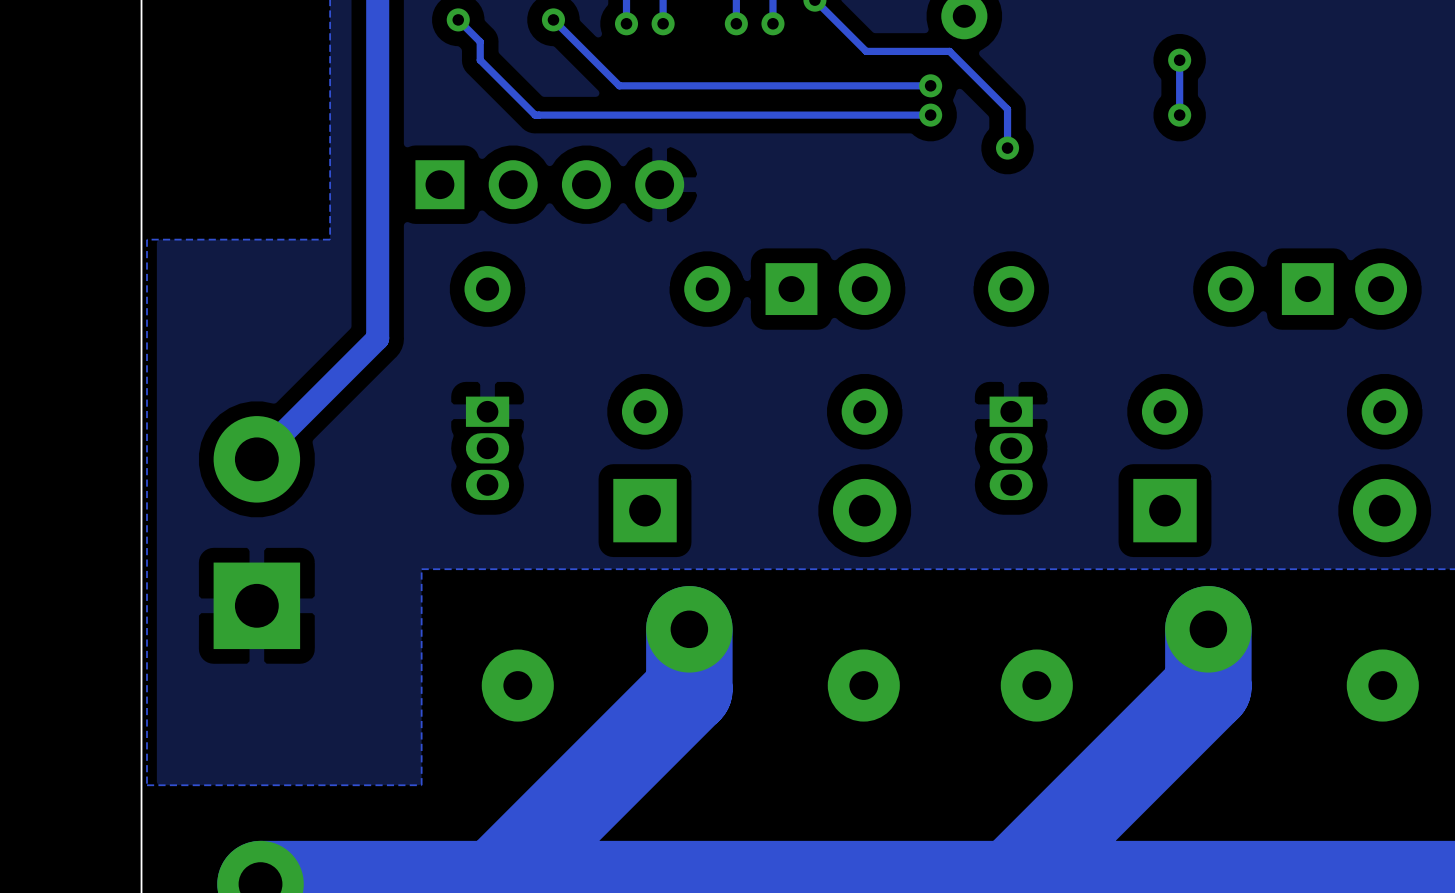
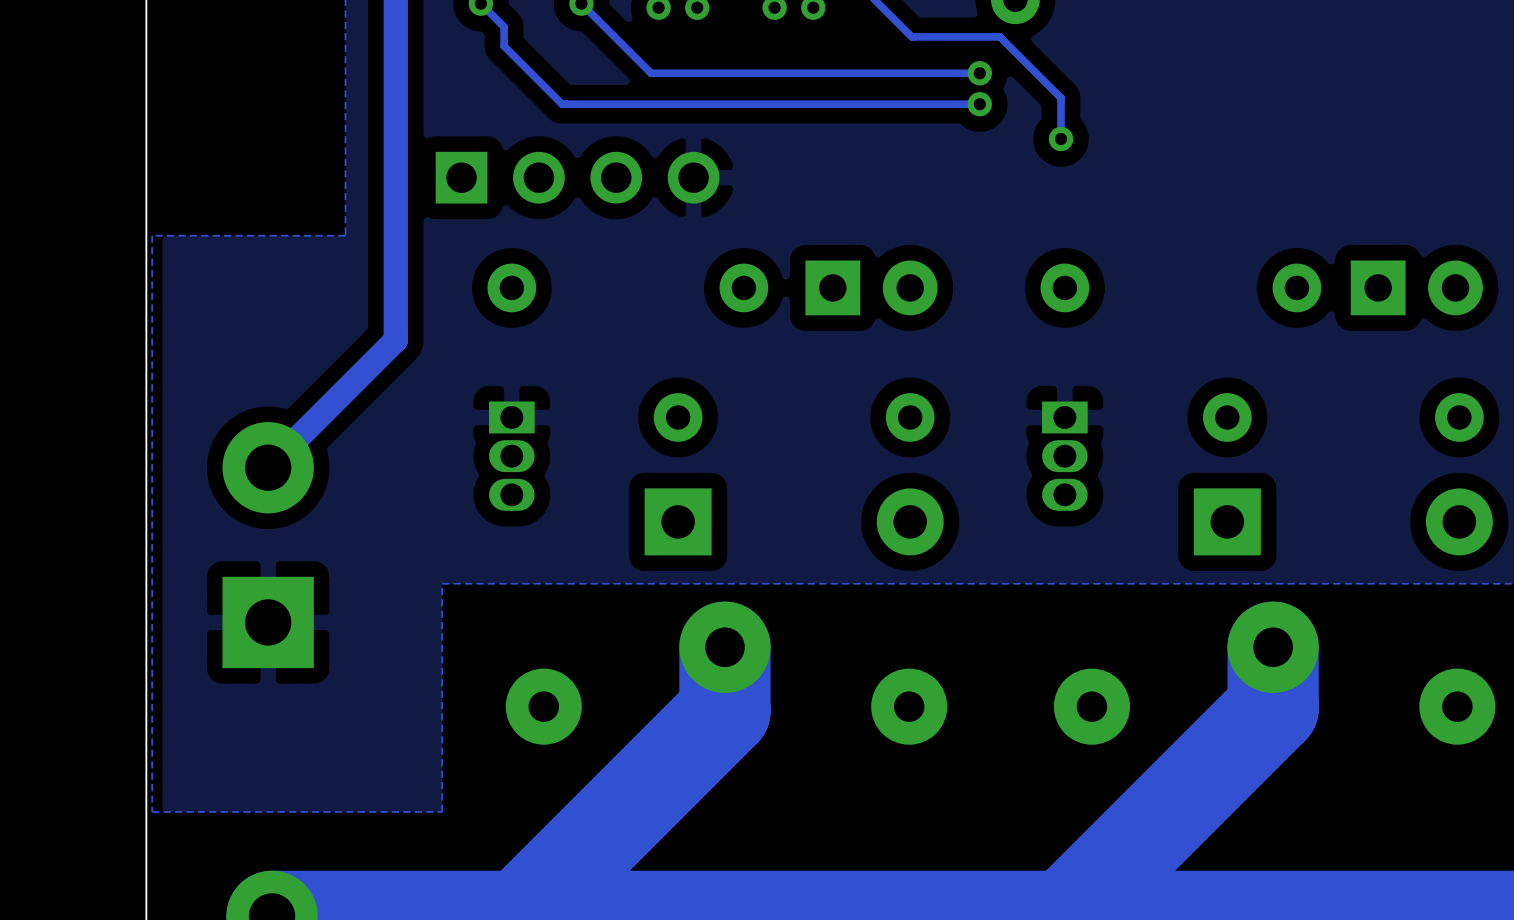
track: (1179, 60) (1179, 115) -> none
via: (1179, 60) -> none
via: (1179, 115) -> none

